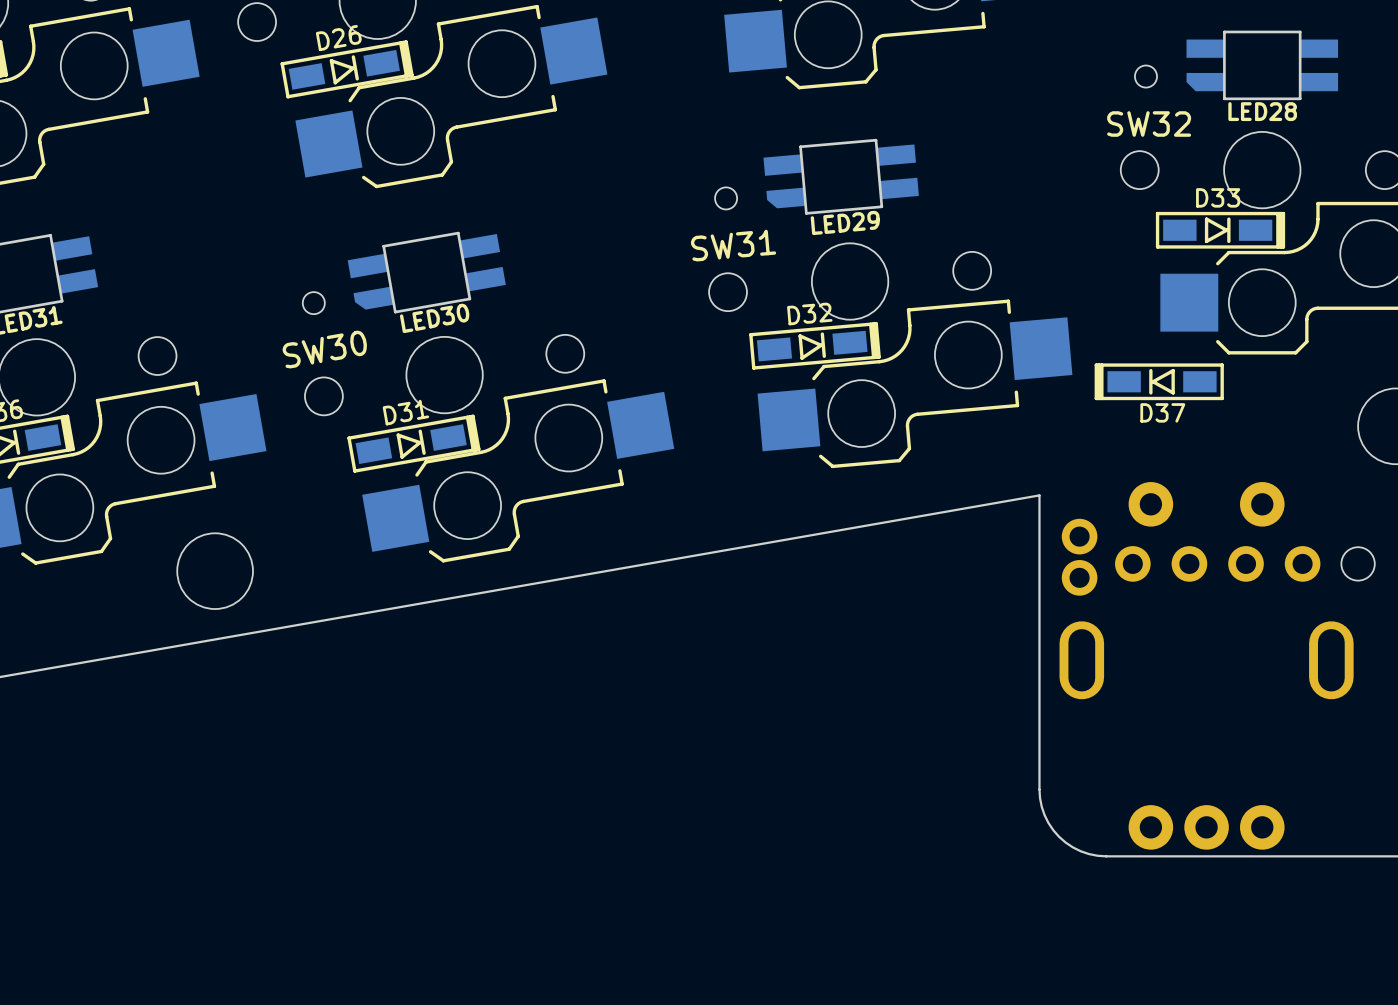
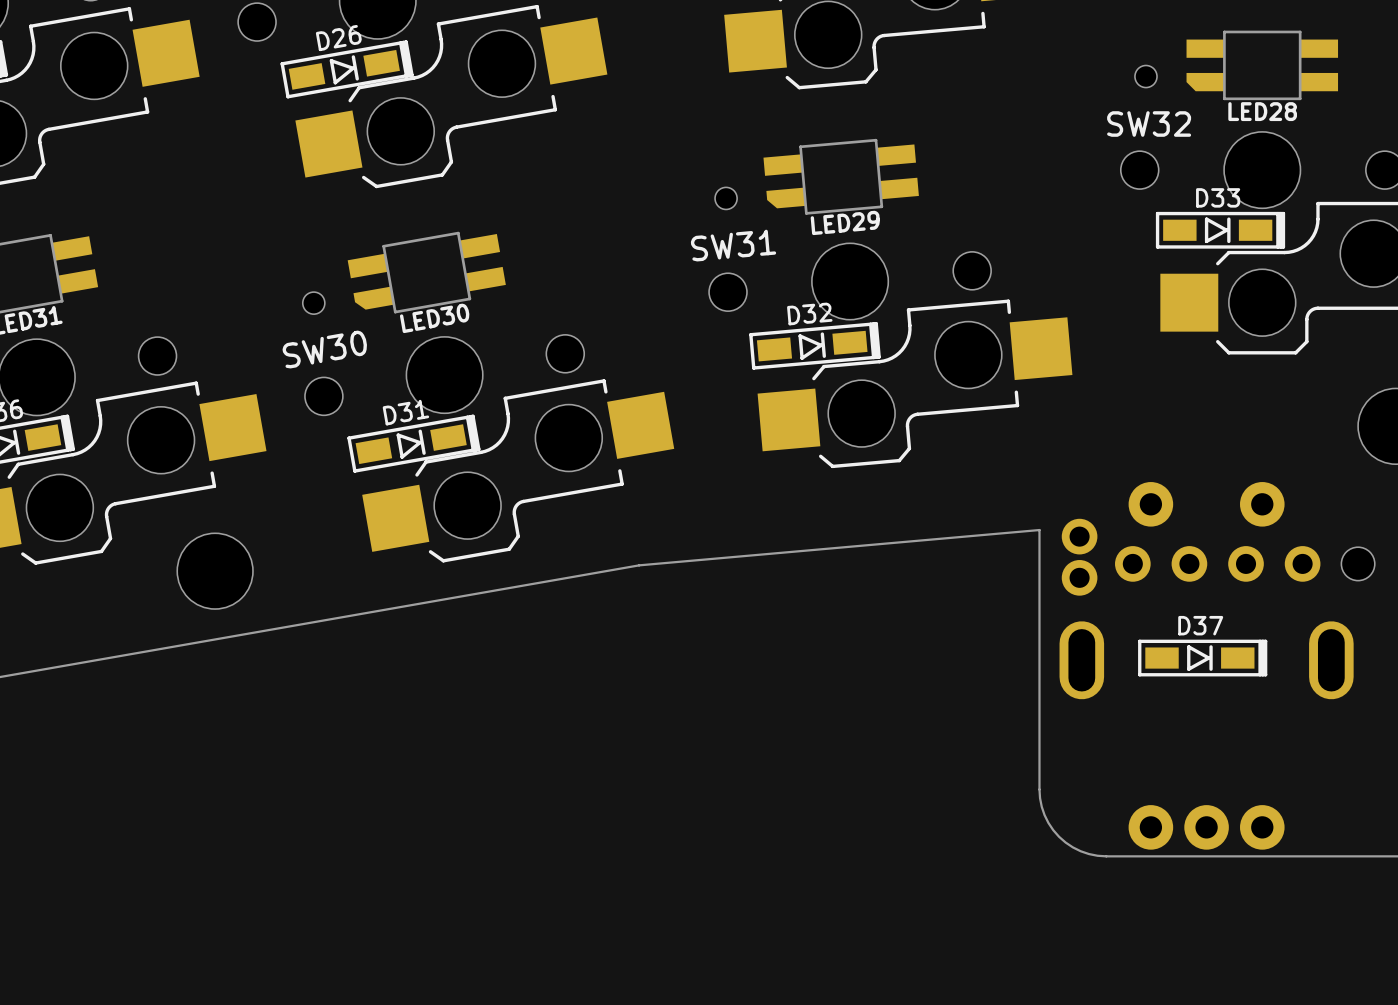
D37 rotation: 0° (1159, 381) -> 180° (1202, 658)
D37 position: (1159, 381) -> (1202, 658)
board edge: (1039, 530) (1039, 495) (639, 565) -> (1039, 530) (639, 565)

